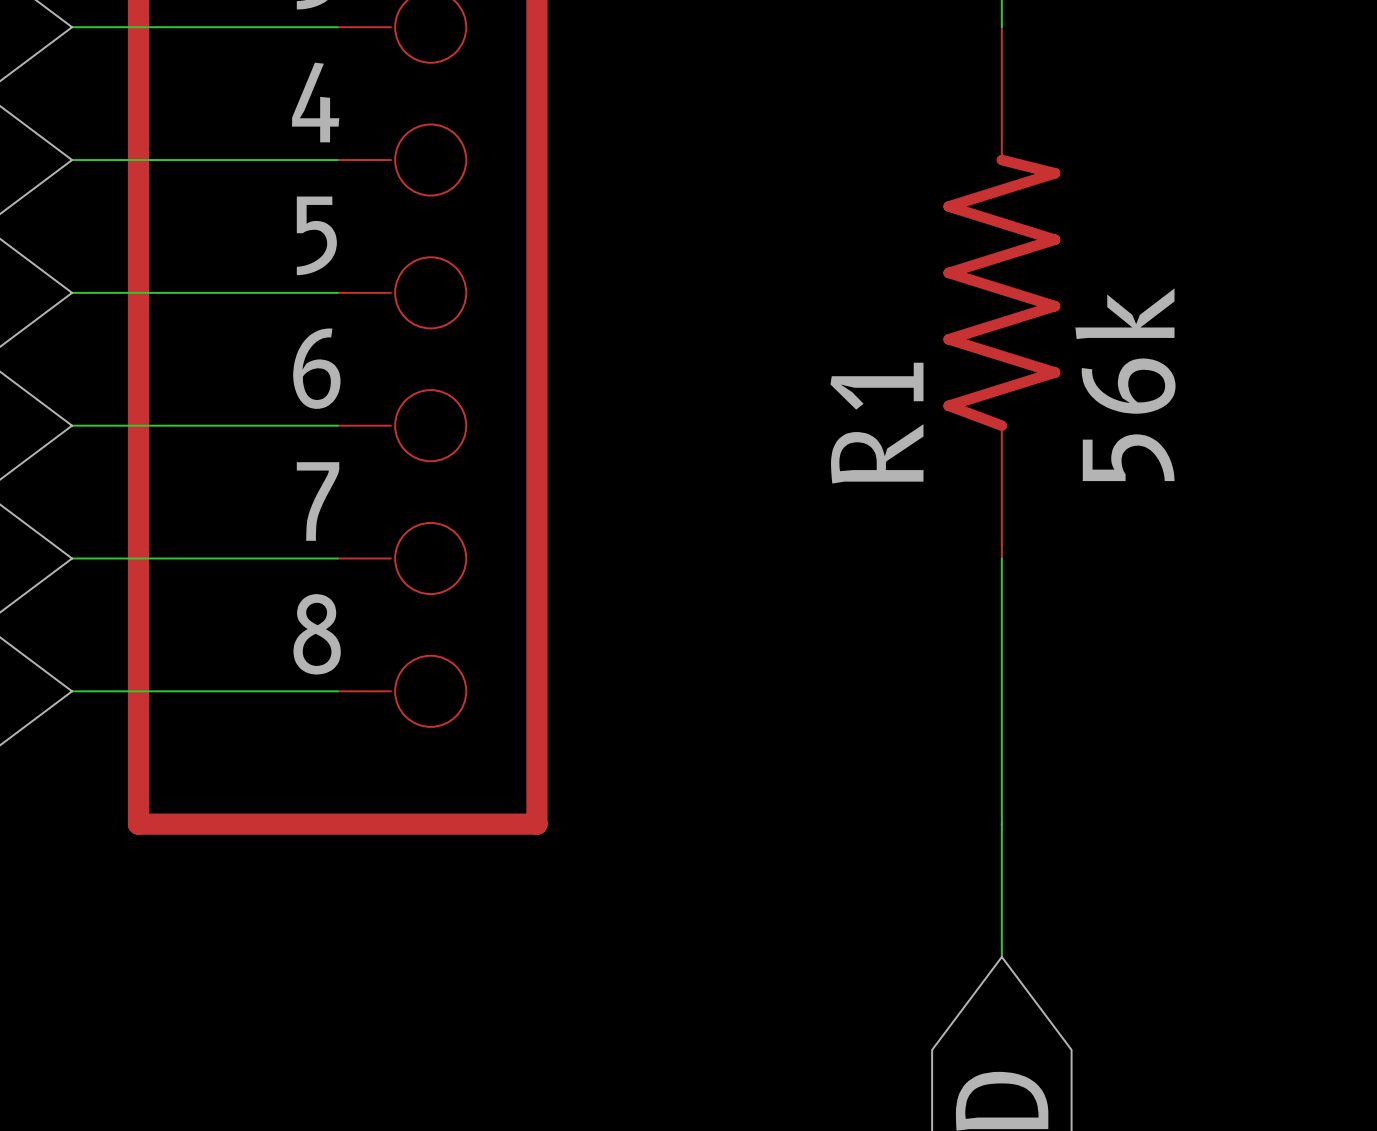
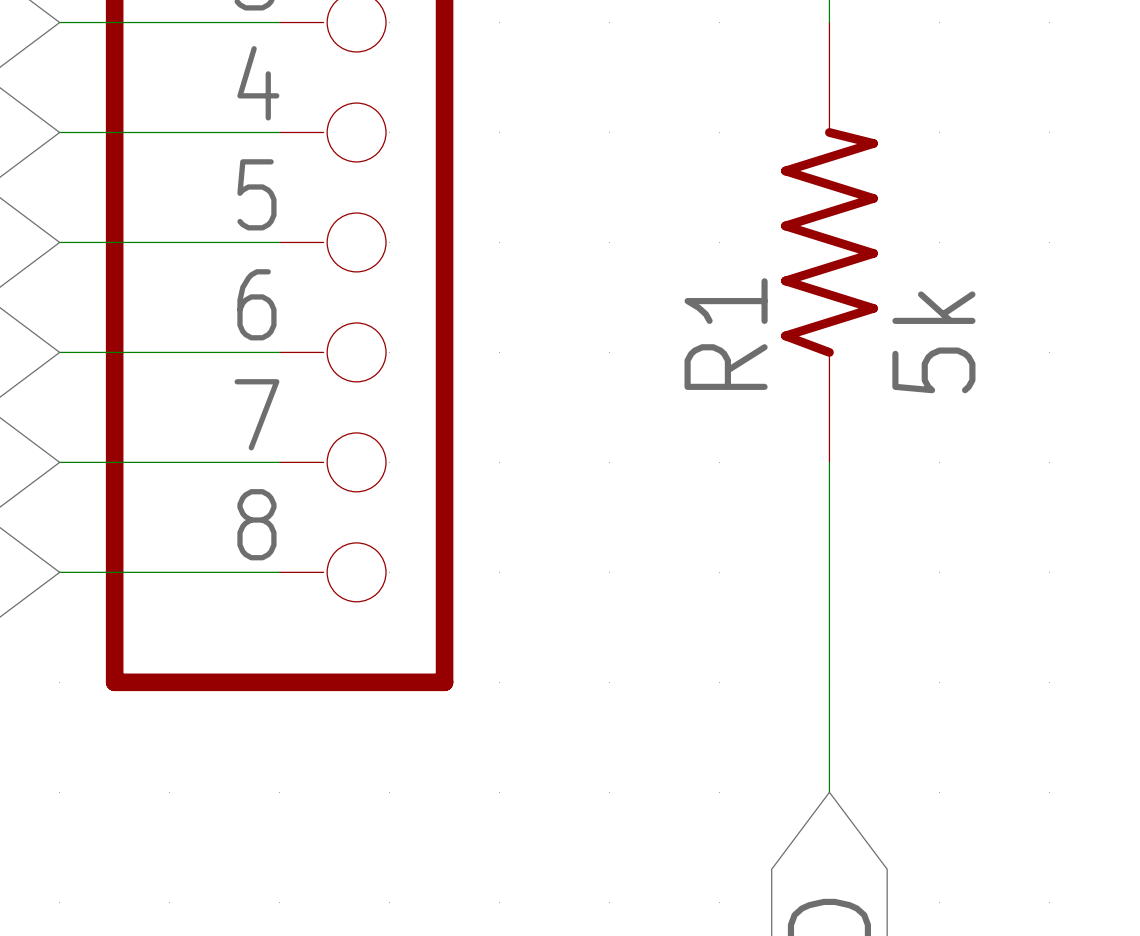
R1 value: 56k (1125, 384) -> 5k (933, 342)

